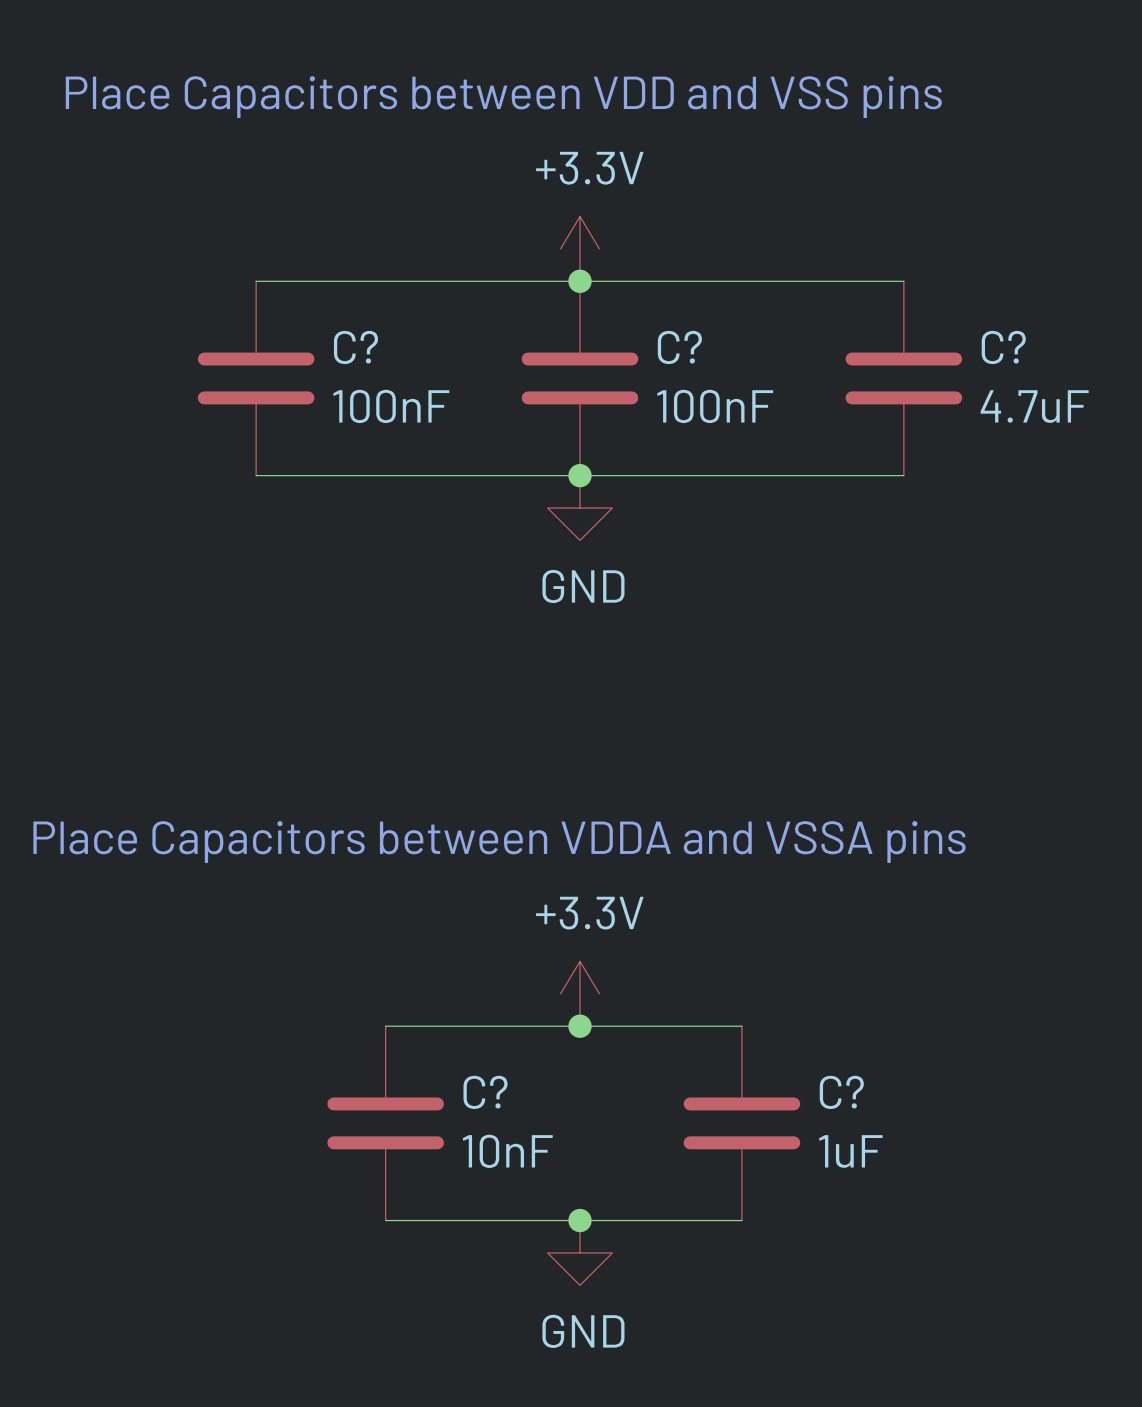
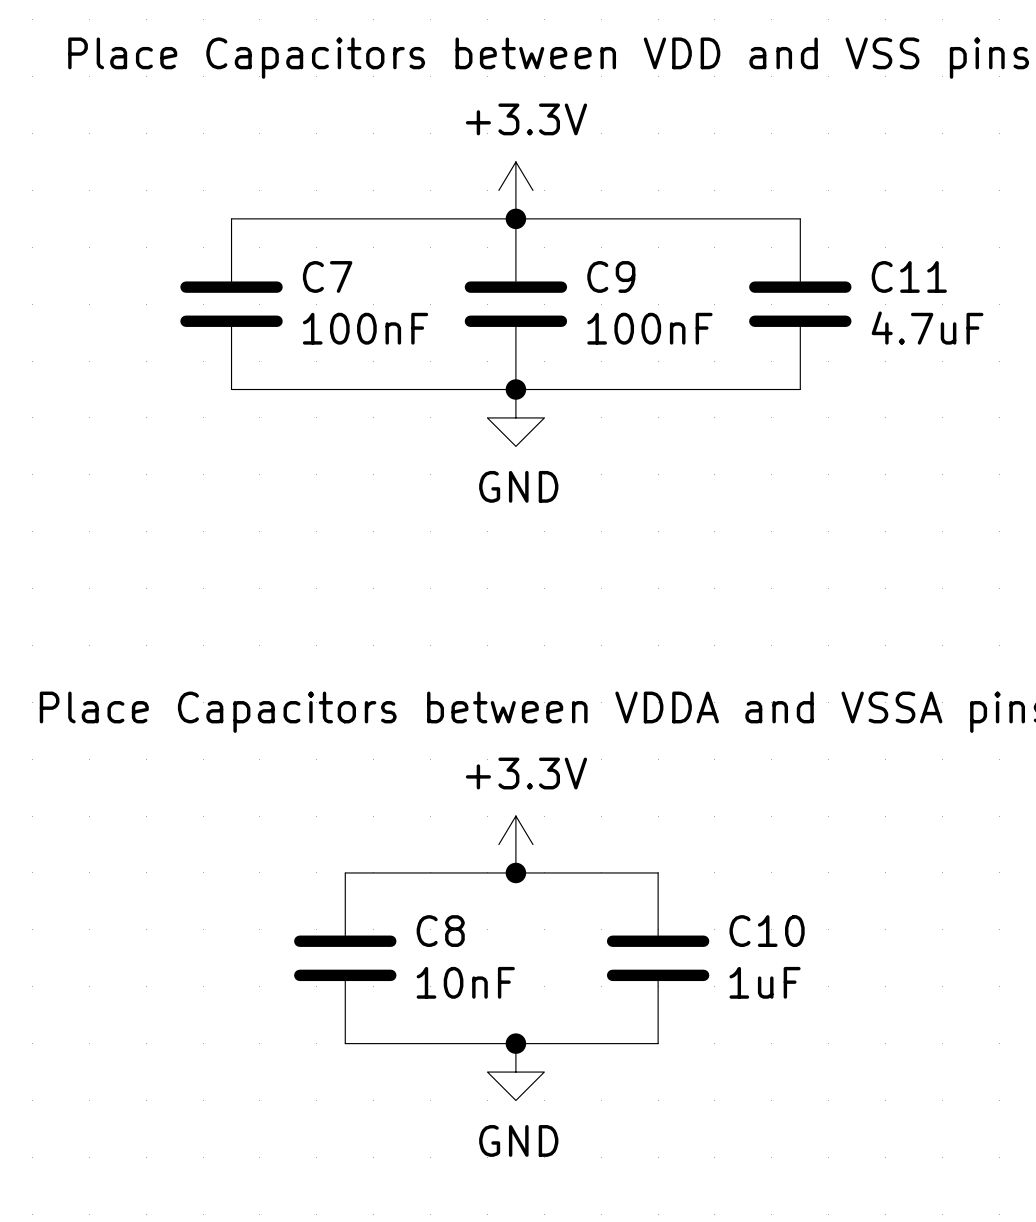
C? name: C? (355, 347) -> C7 (327, 276)
C? name: C? (679, 347) -> C9 (611, 276)
C? name: C? (1003, 347) -> C11 (909, 276)
C? name: C? (485, 1092) -> C8 (440, 931)
C? name: C? (841, 1092) -> C10 (767, 931)

